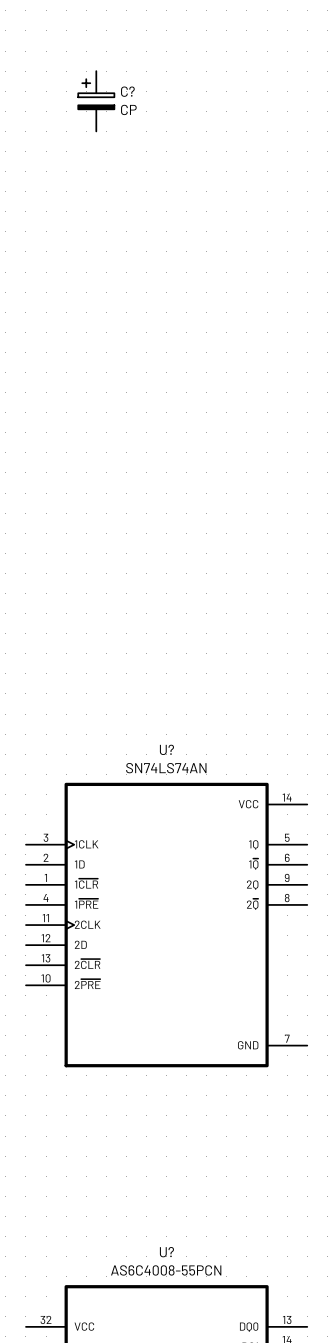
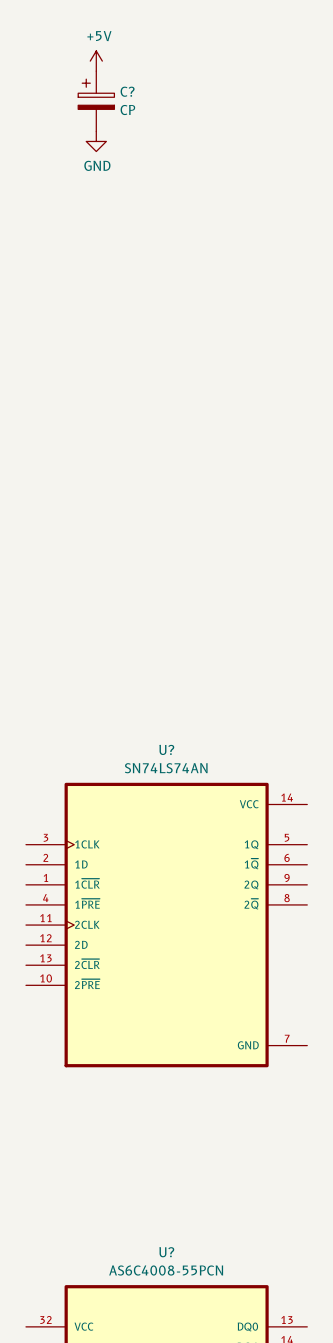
power symbol: none -> +5V (96, 61)
power symbol: none -> GND (96, 141)

